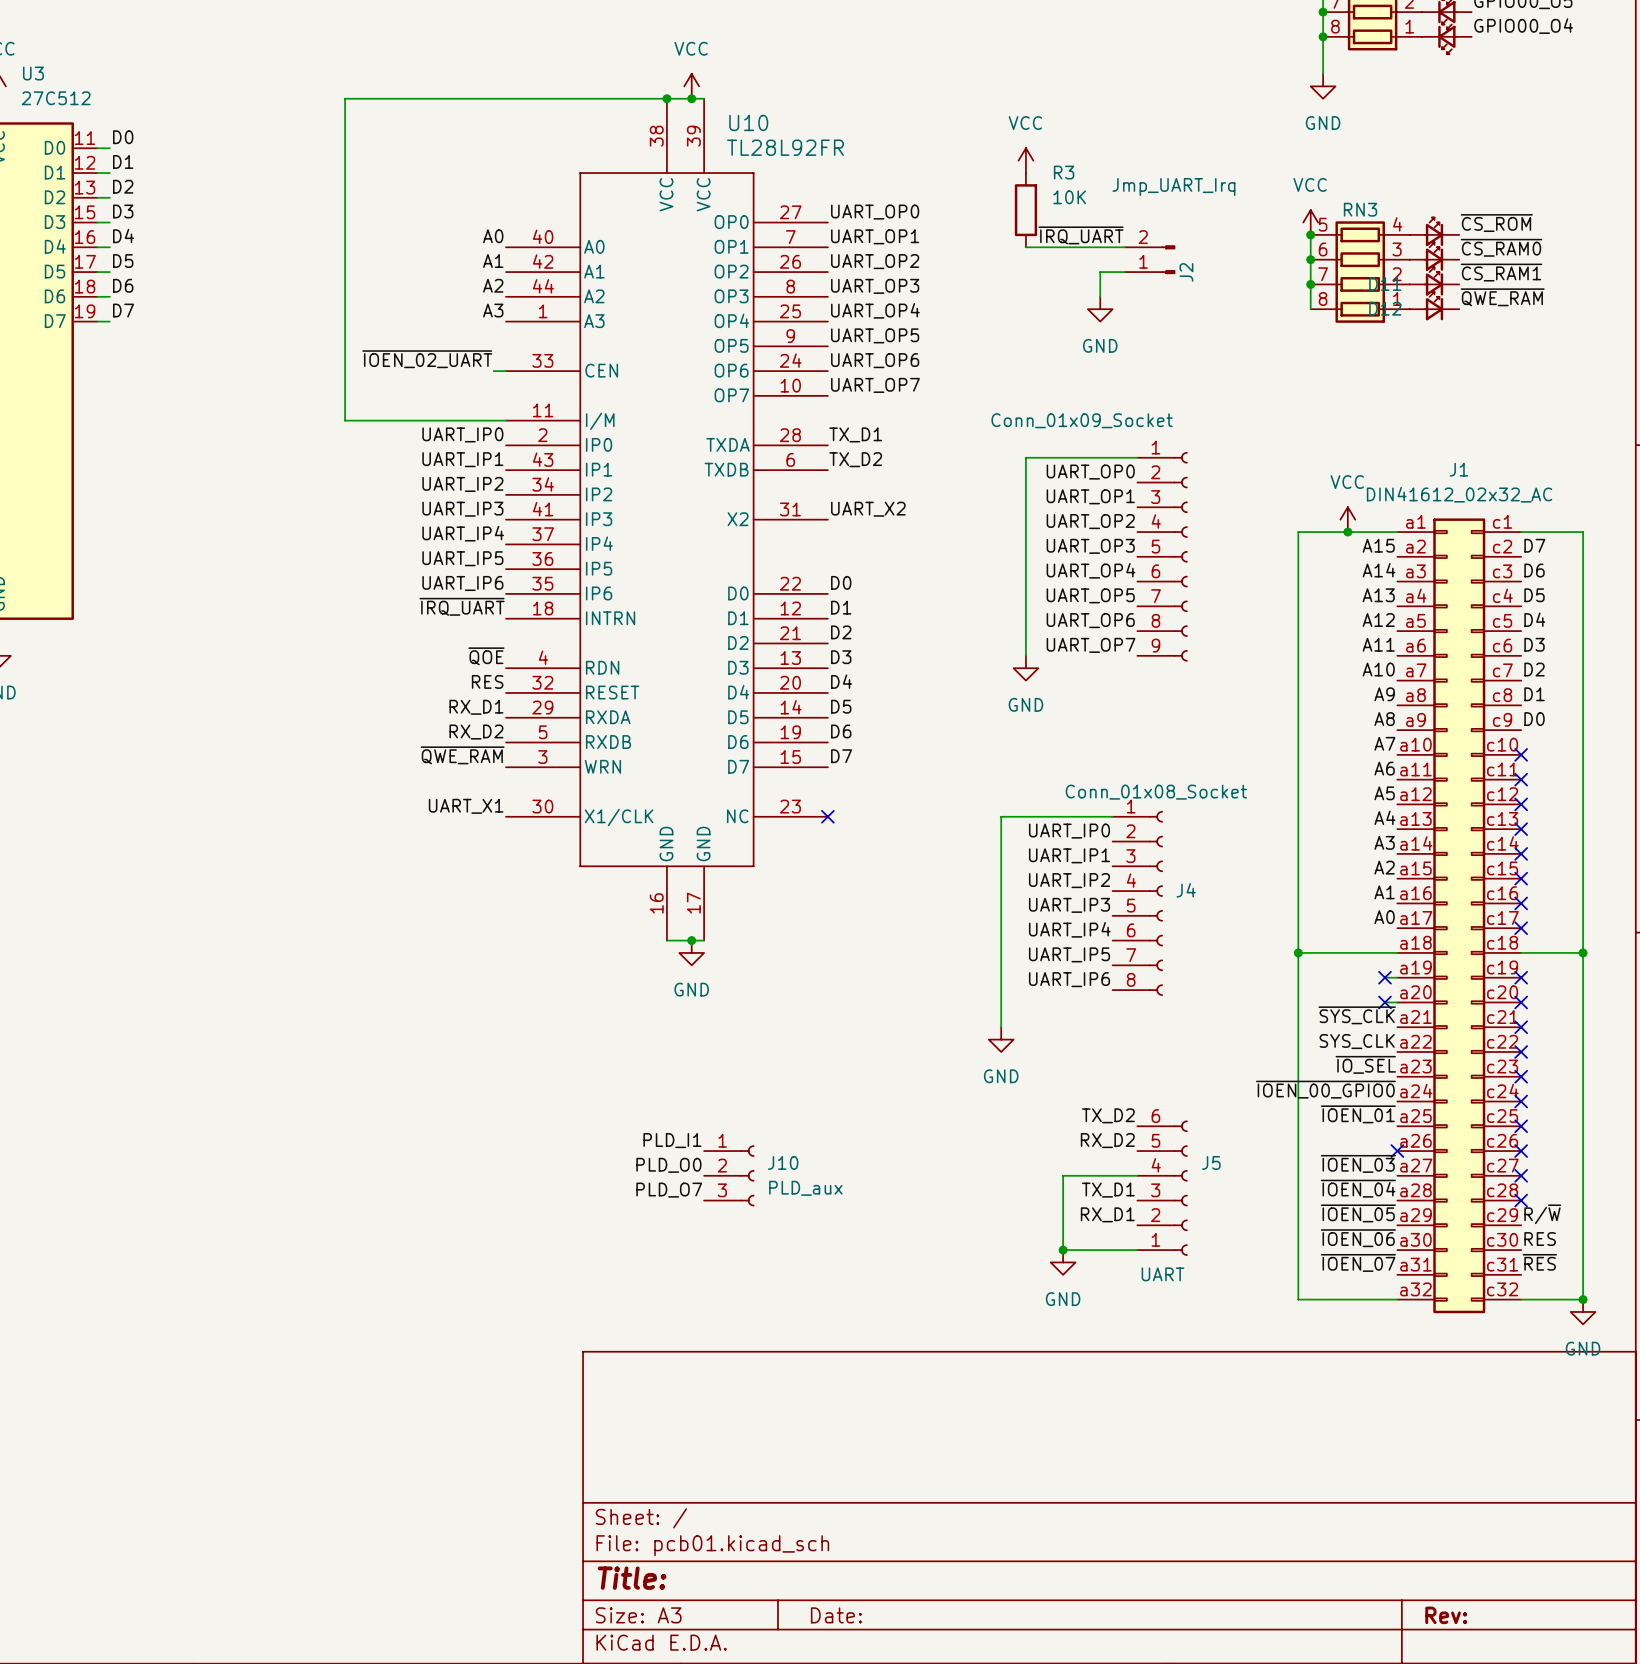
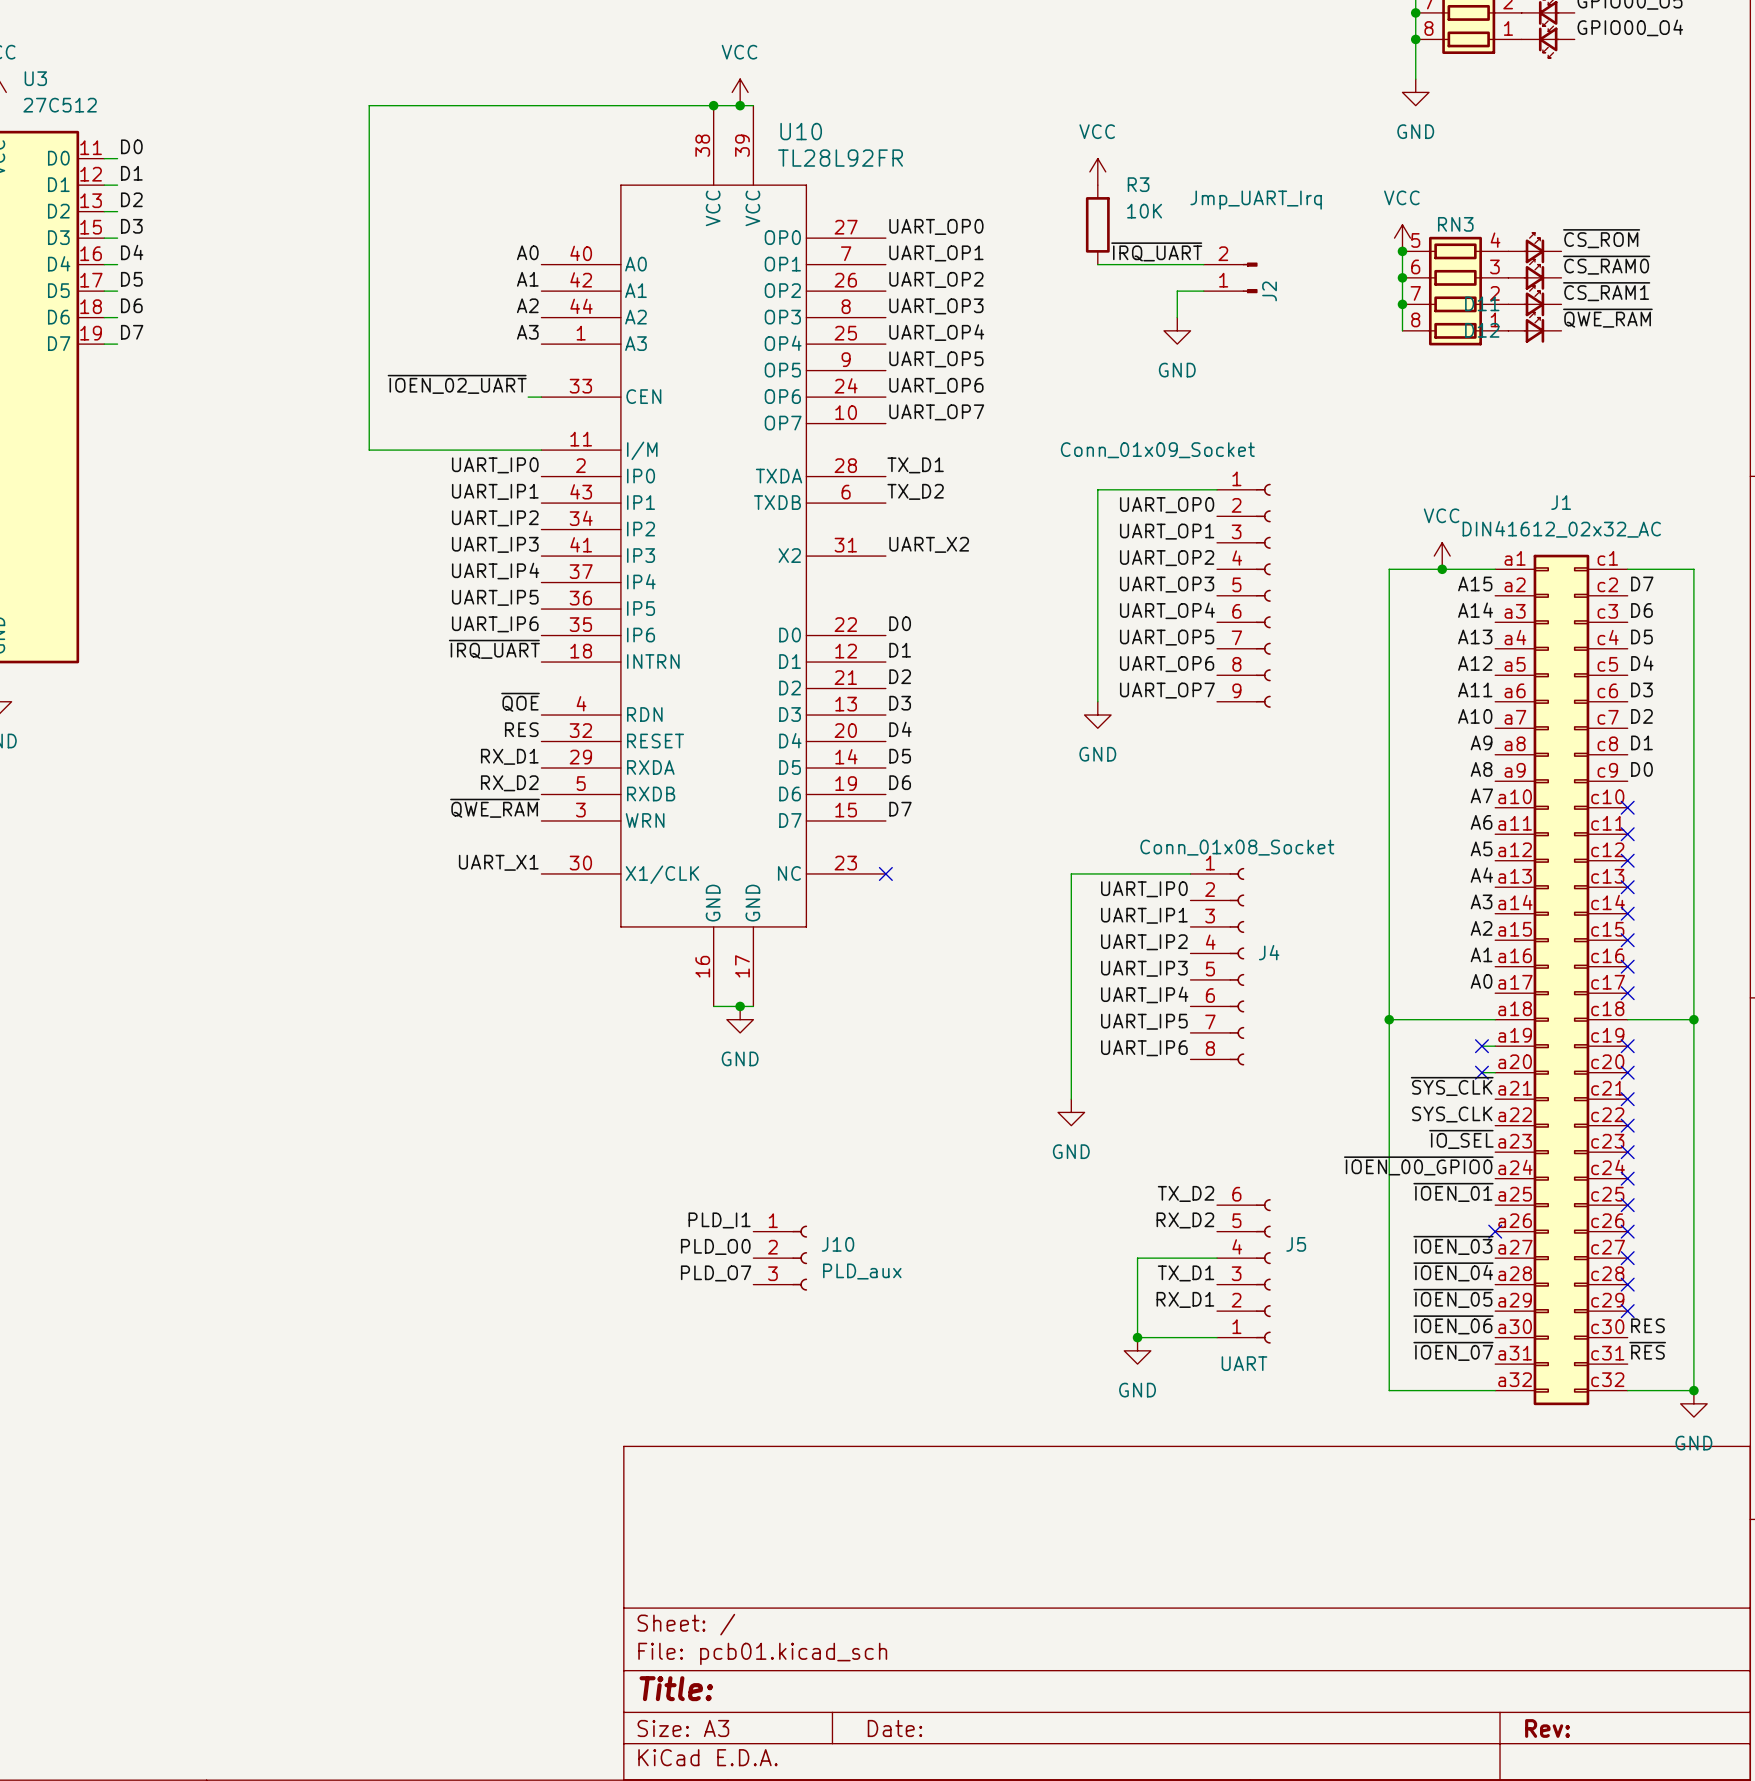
label: R/~{W} (1542, 1214) -> none
no-connect mark: none -> (1627, 1311)

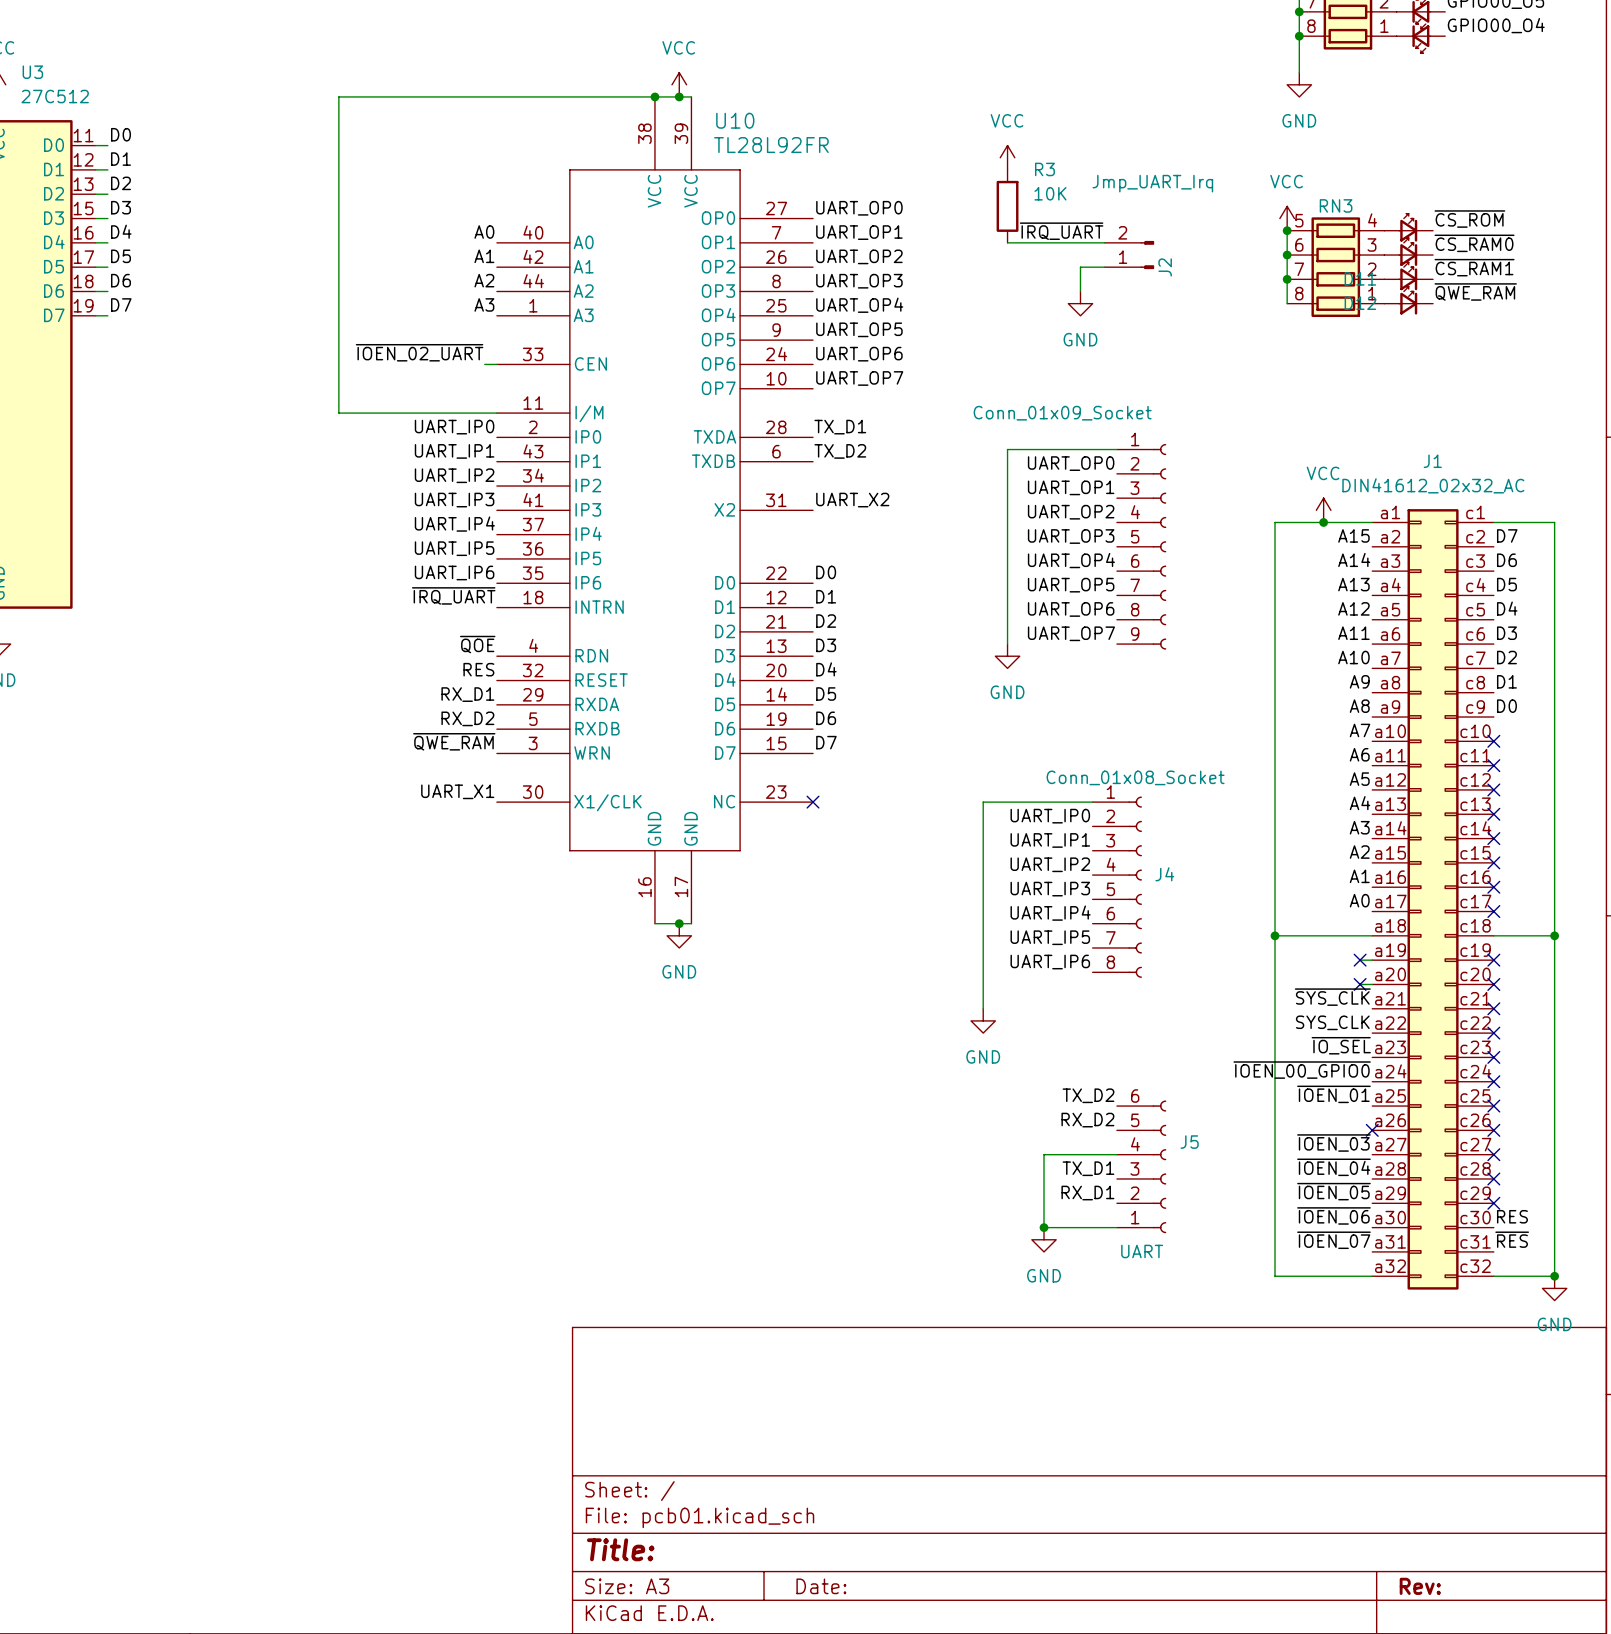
label: PLD_I1 (719, 1220) -> none
label: PLD_O0 (715, 1246) -> none
J10: PLD_aux (780, 1258) -> none
label: PLD_O7 (716, 1273) -> none

